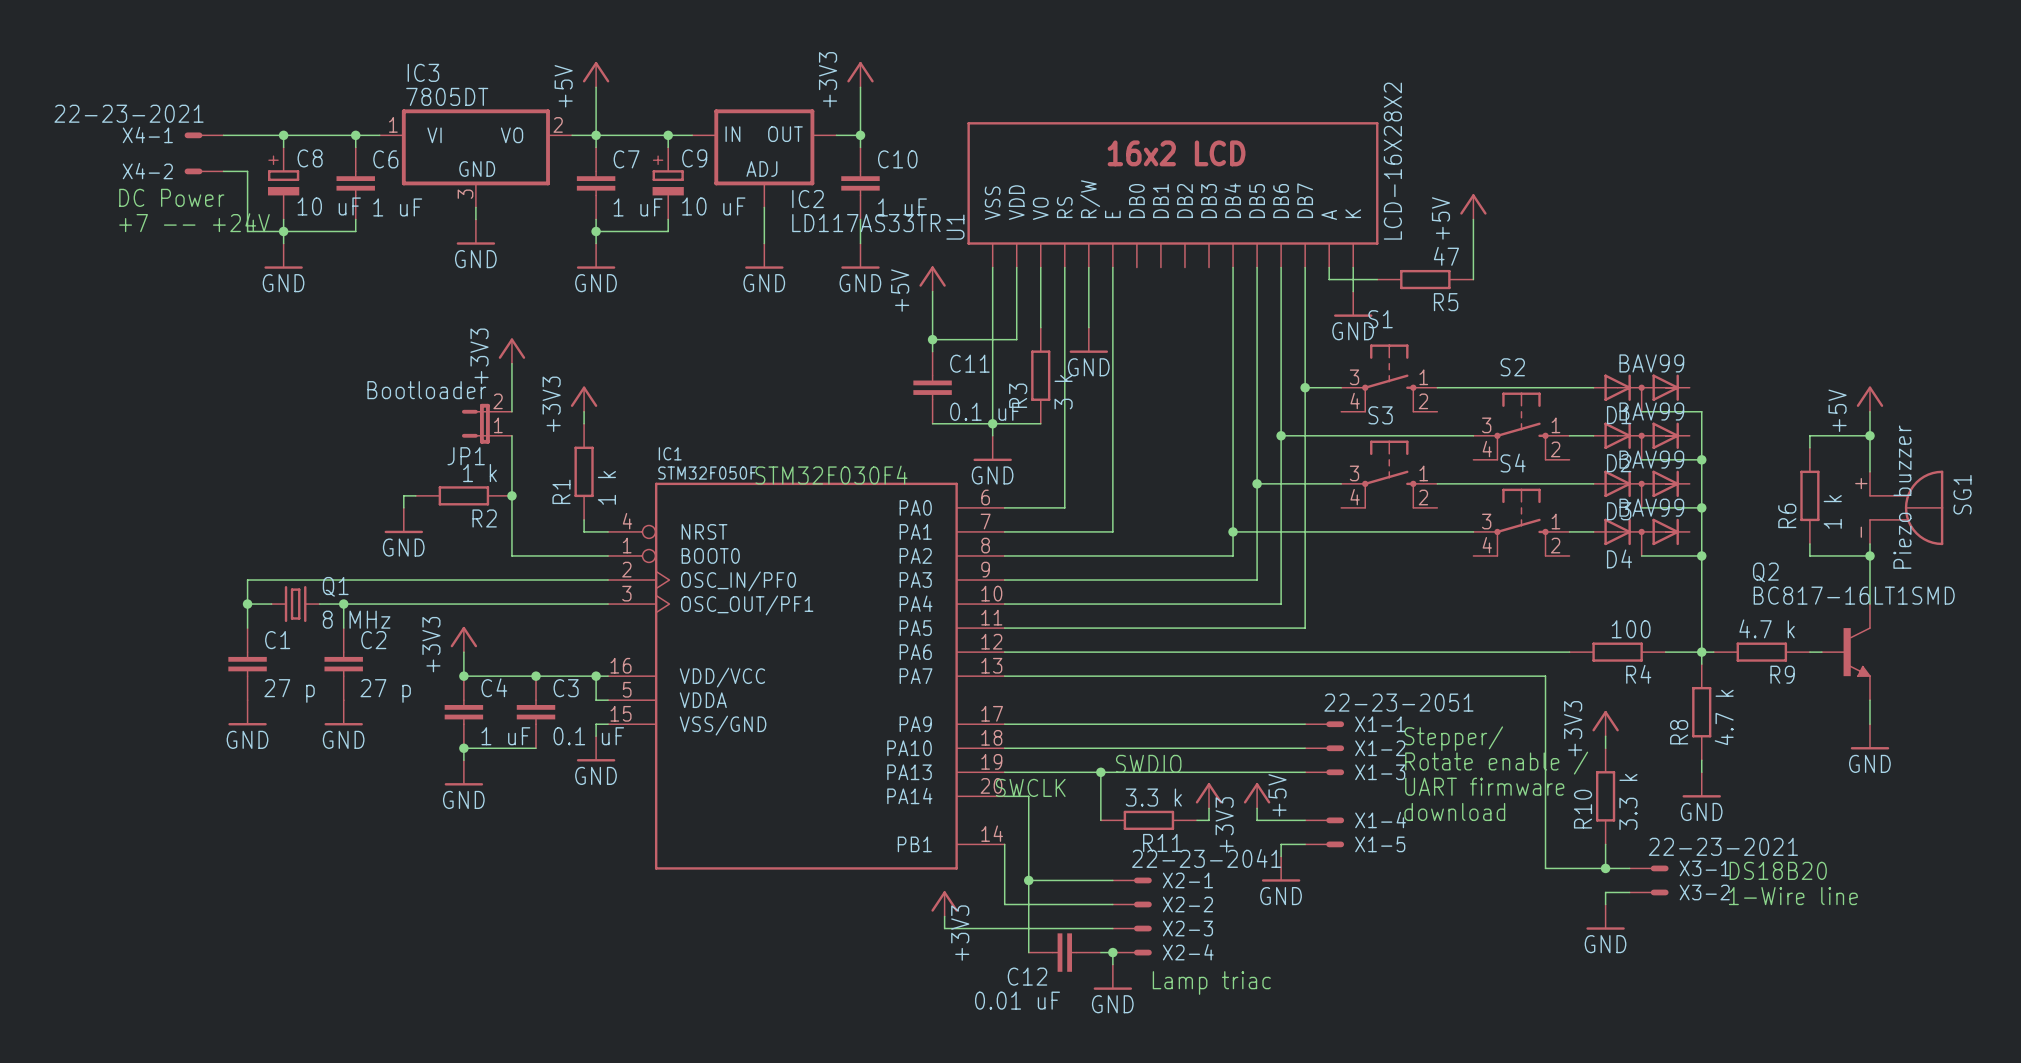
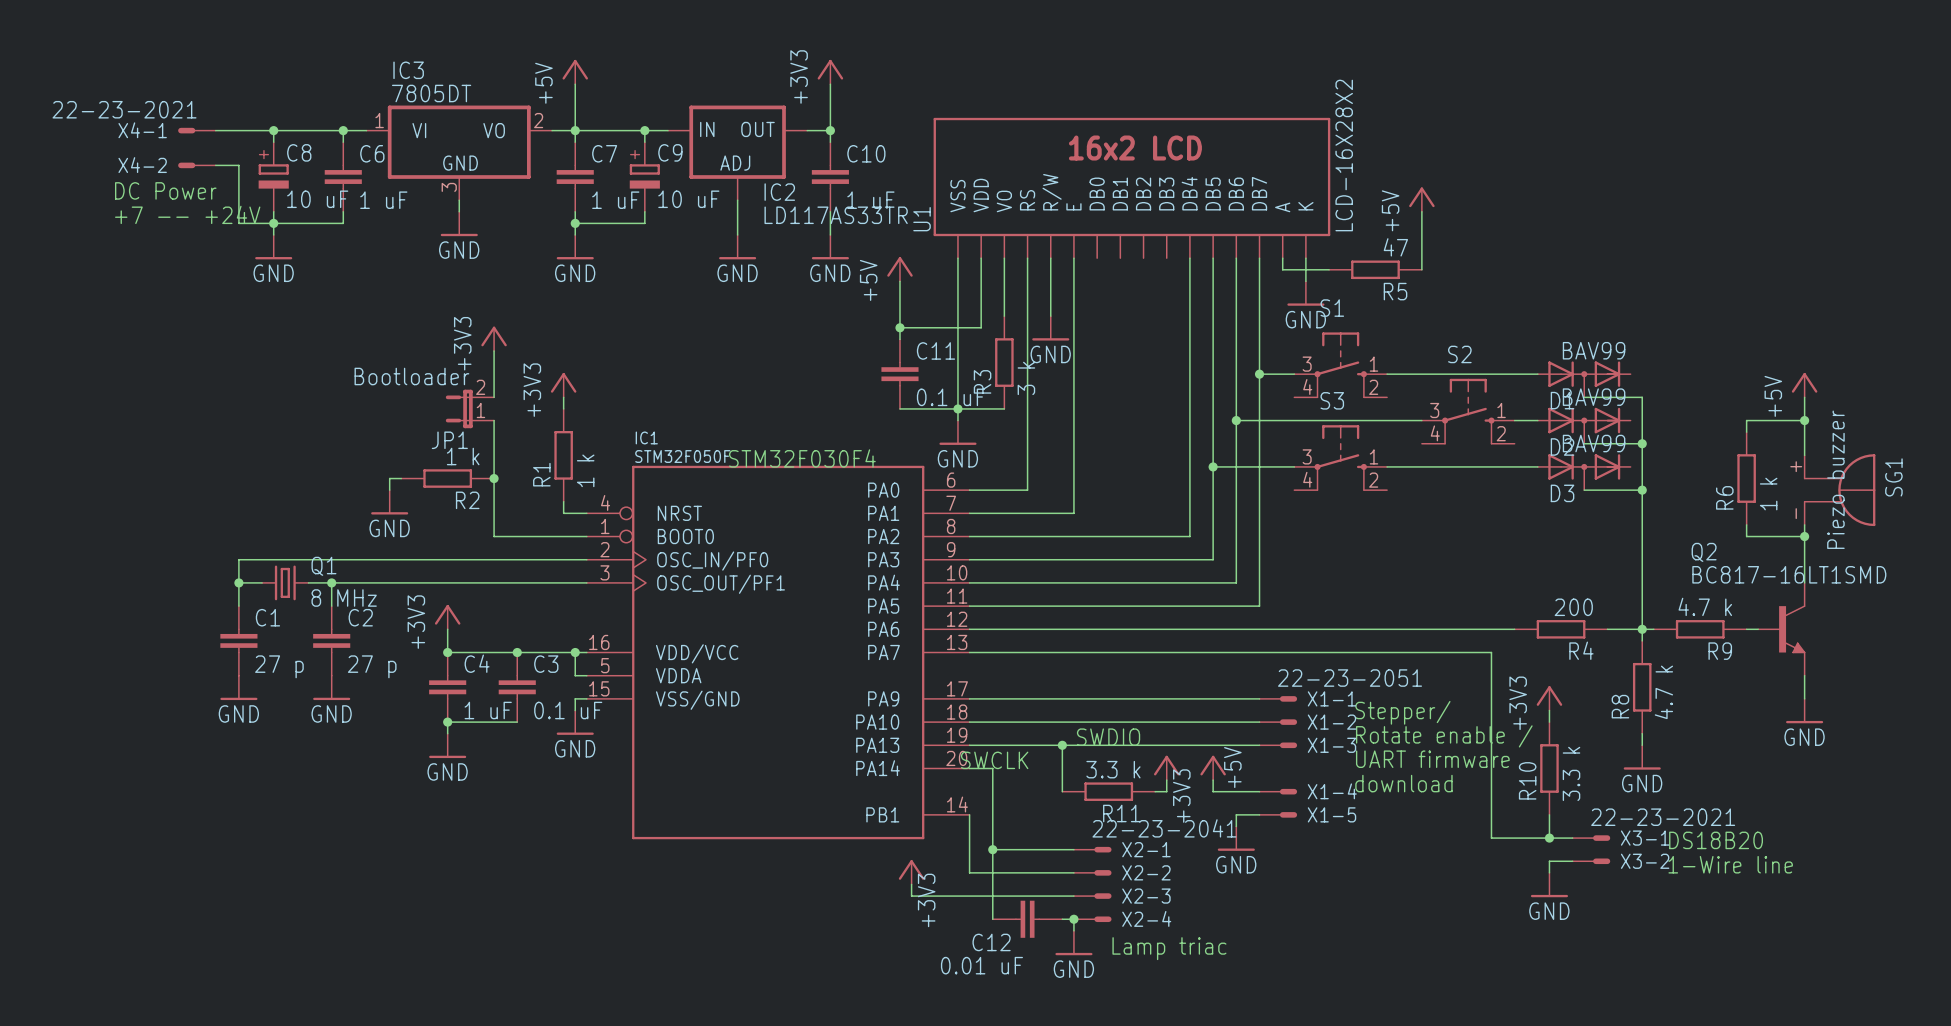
S4: (1521, 522) -> none
wire: (1233, 531) (1473, 531) -> none
junction: (1233, 531) -> none
wire: (1569, 531) (1593, 531) -> none
D4: BAV99 (1641, 537) -> none
wire: (1641, 555) (1701, 555) -> none
junction: (1701, 555) -> none
R4 value: 100 (1631, 629) -> 200 (1573, 607)

